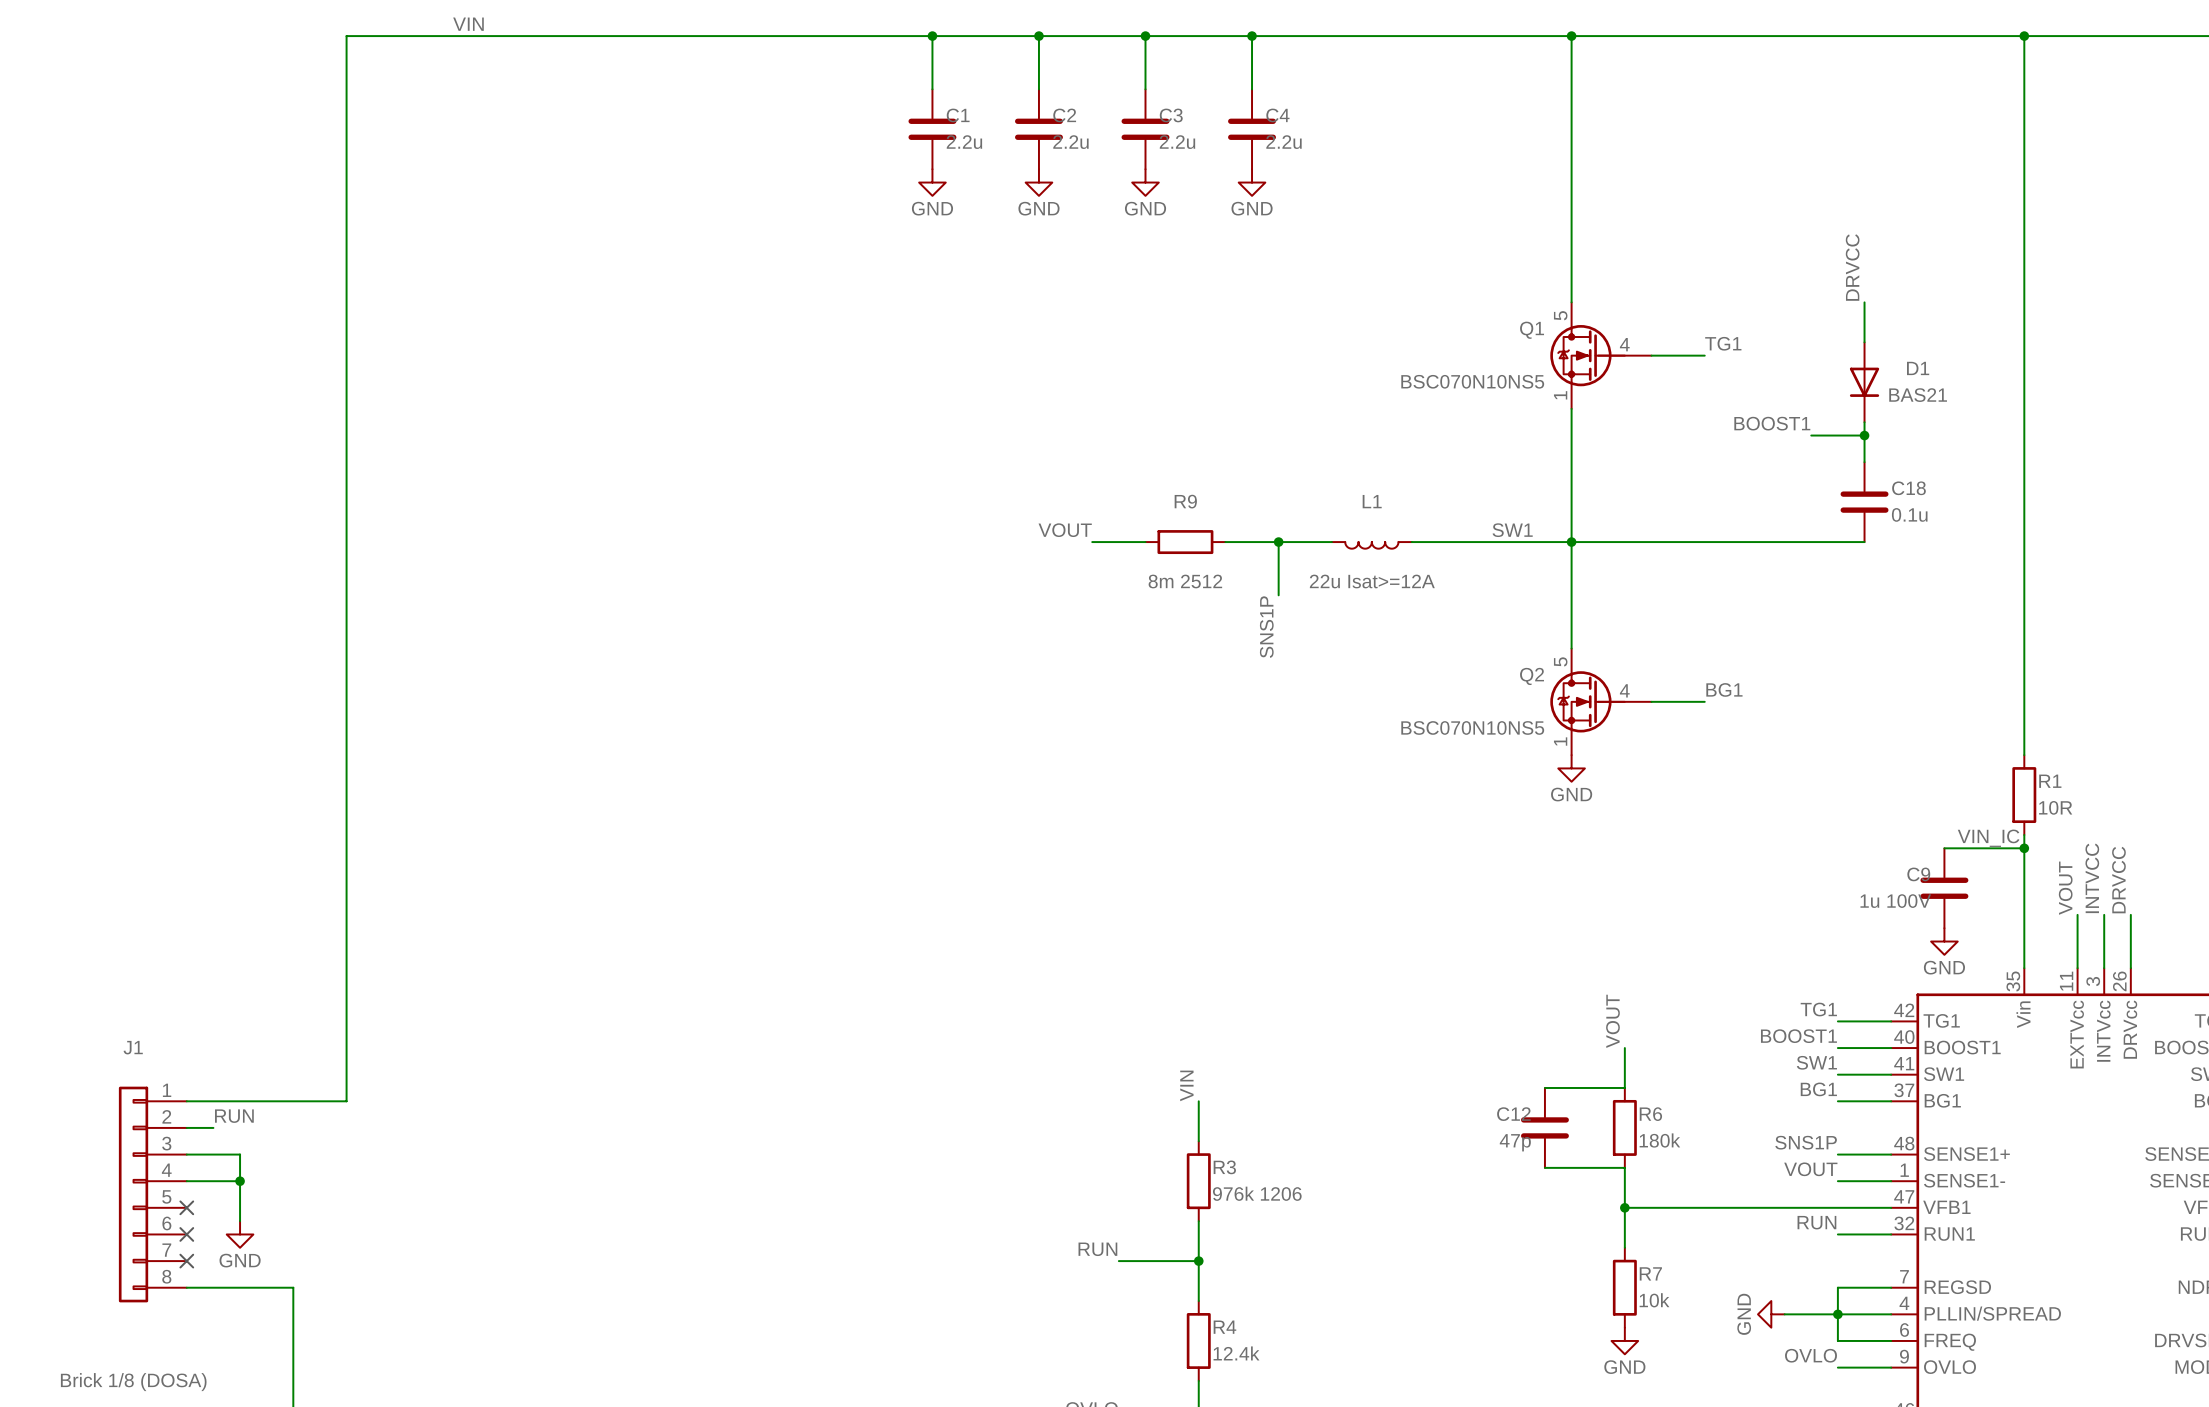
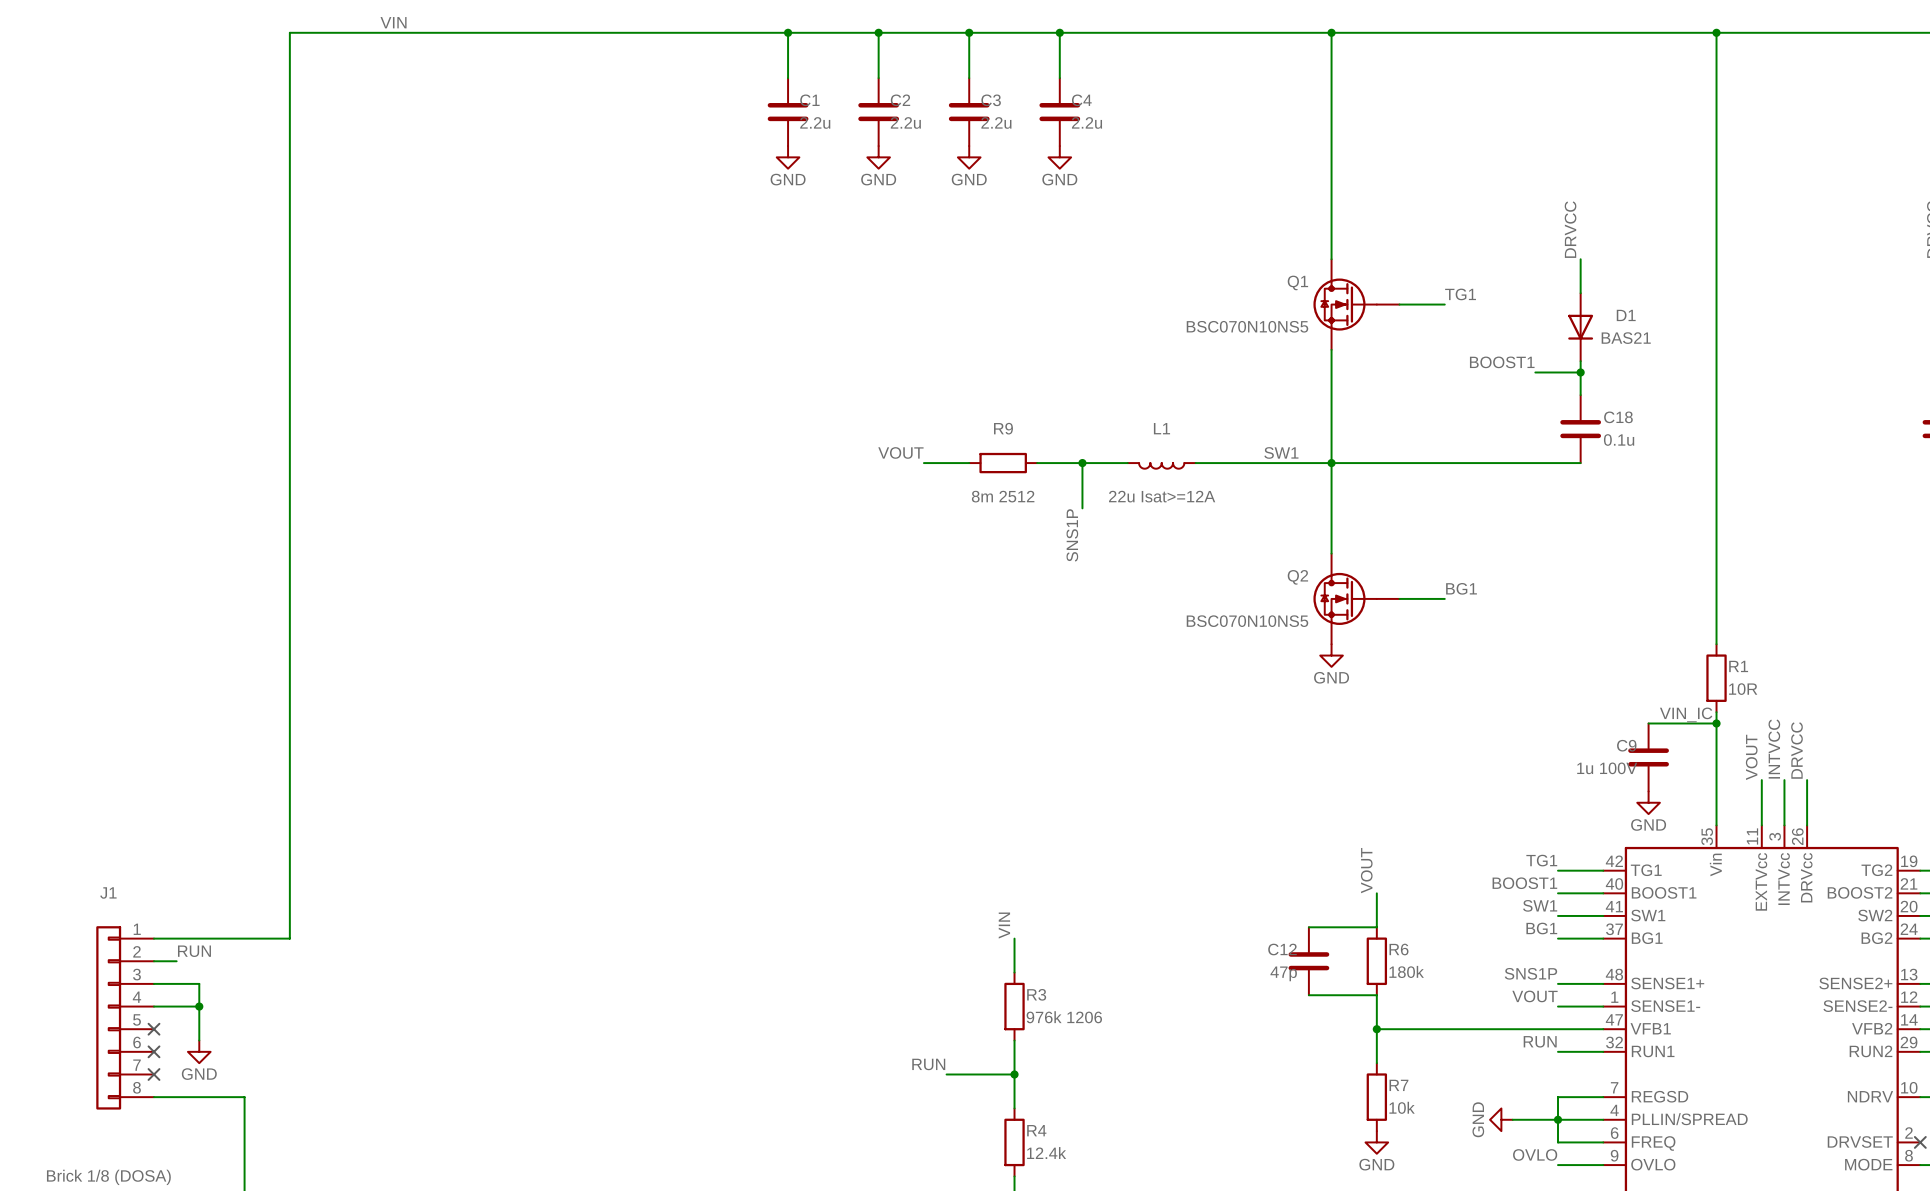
Q1 symbol: [1550, 302, 1652, 409] -> [1313, 259, 1400, 350]
Q2 symbol: [1550, 648, 1652, 756] -> [1313, 553, 1400, 645]

